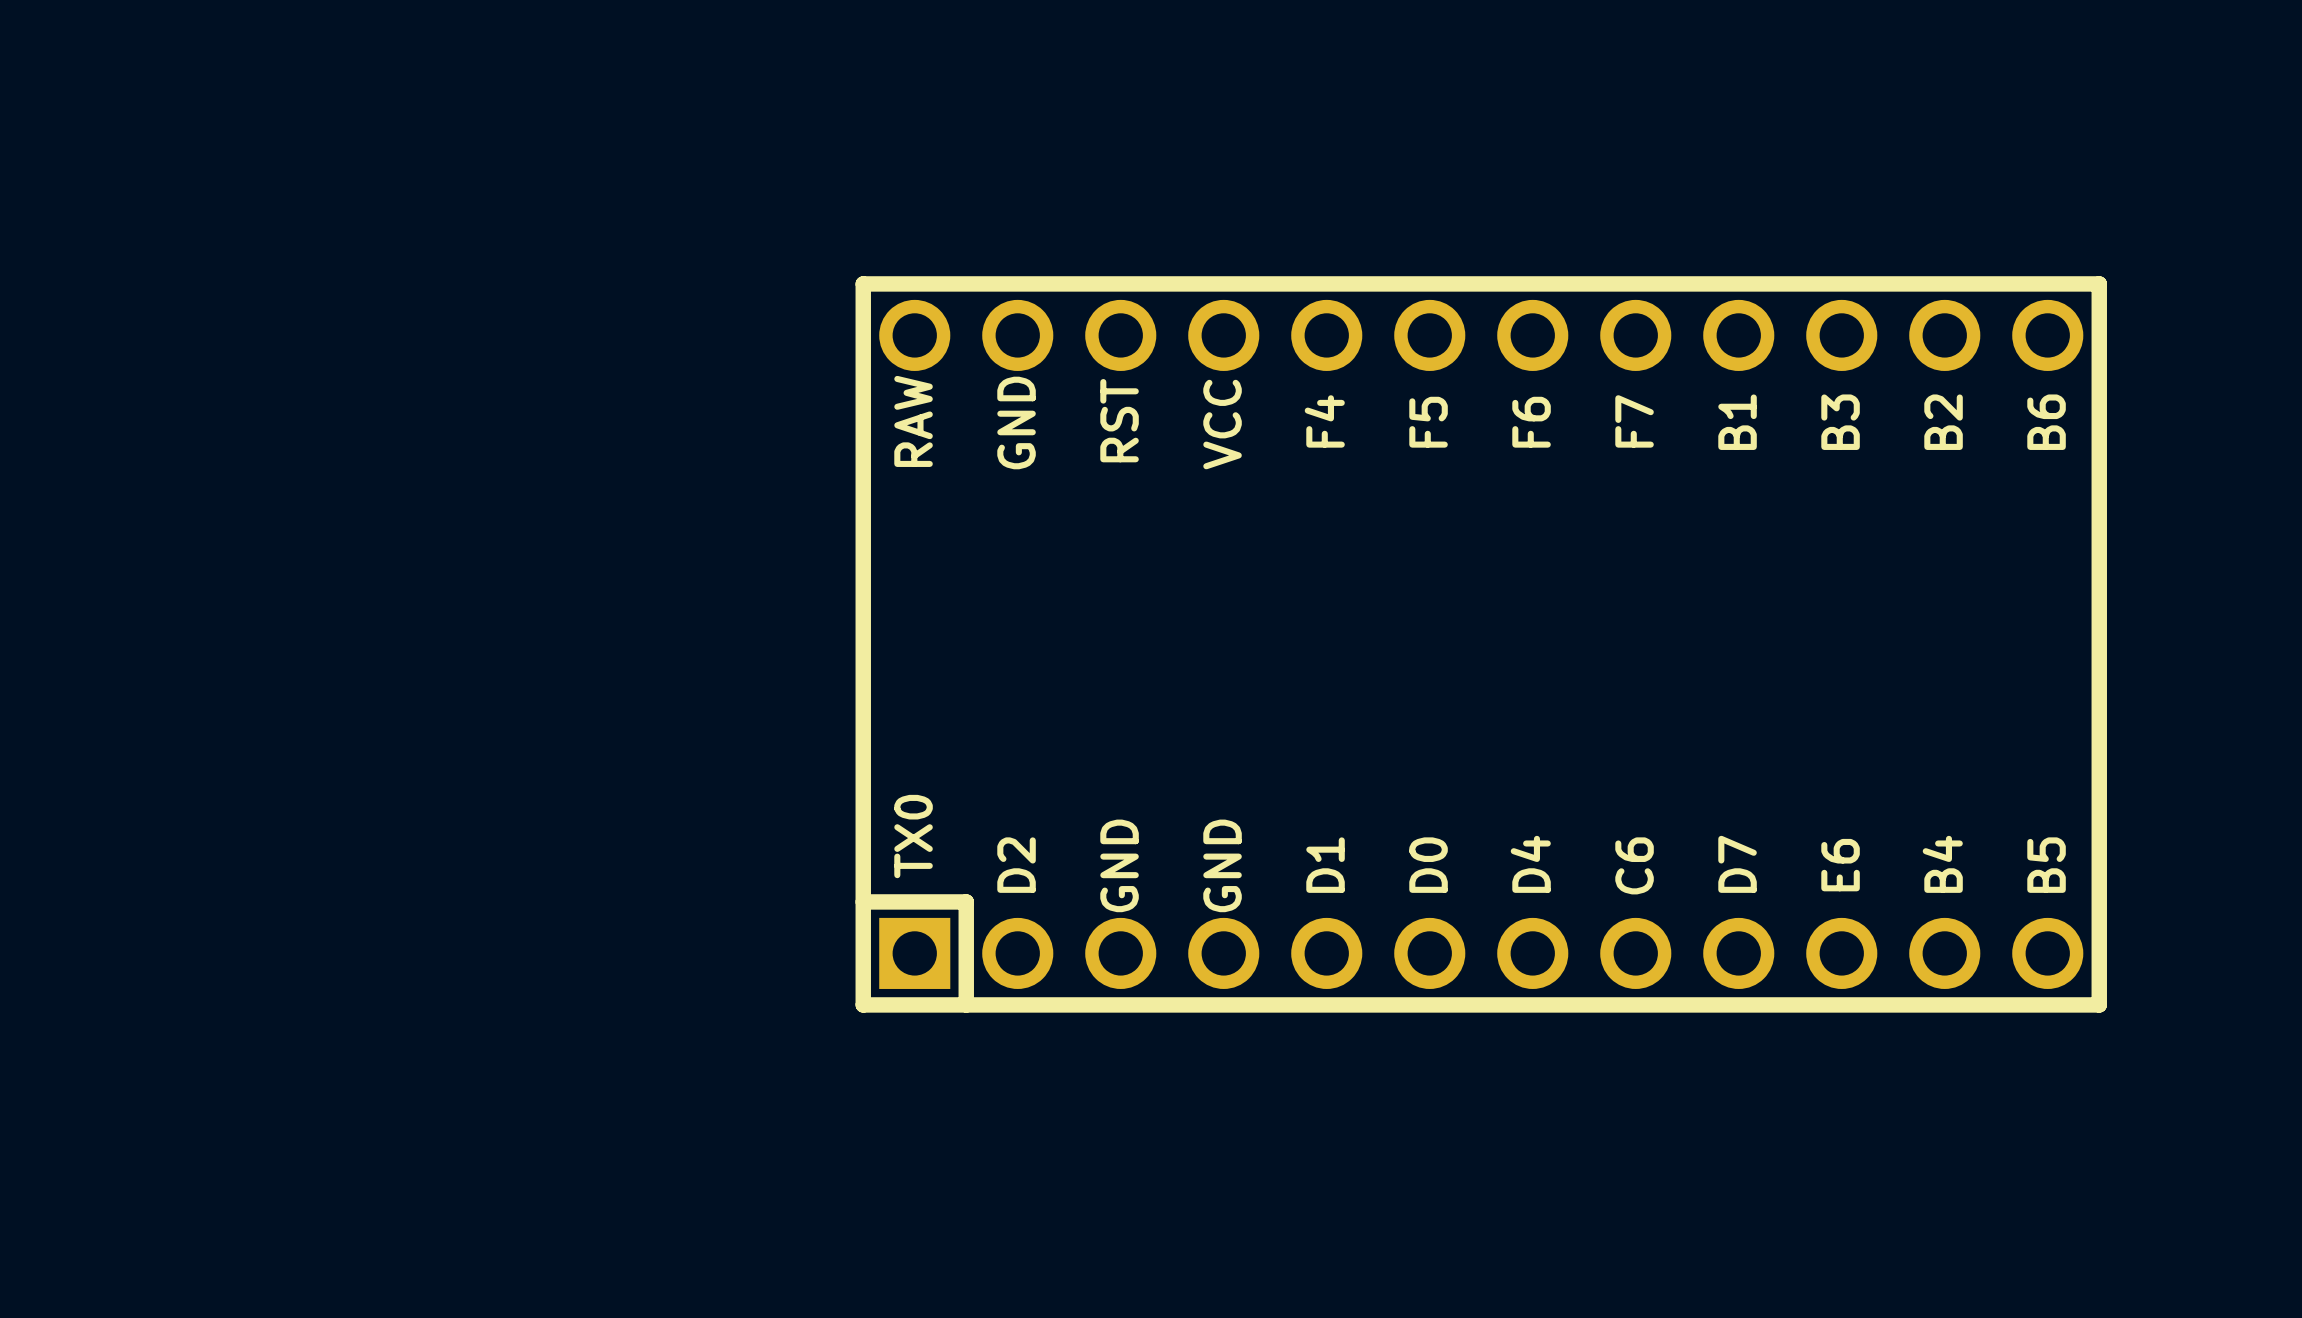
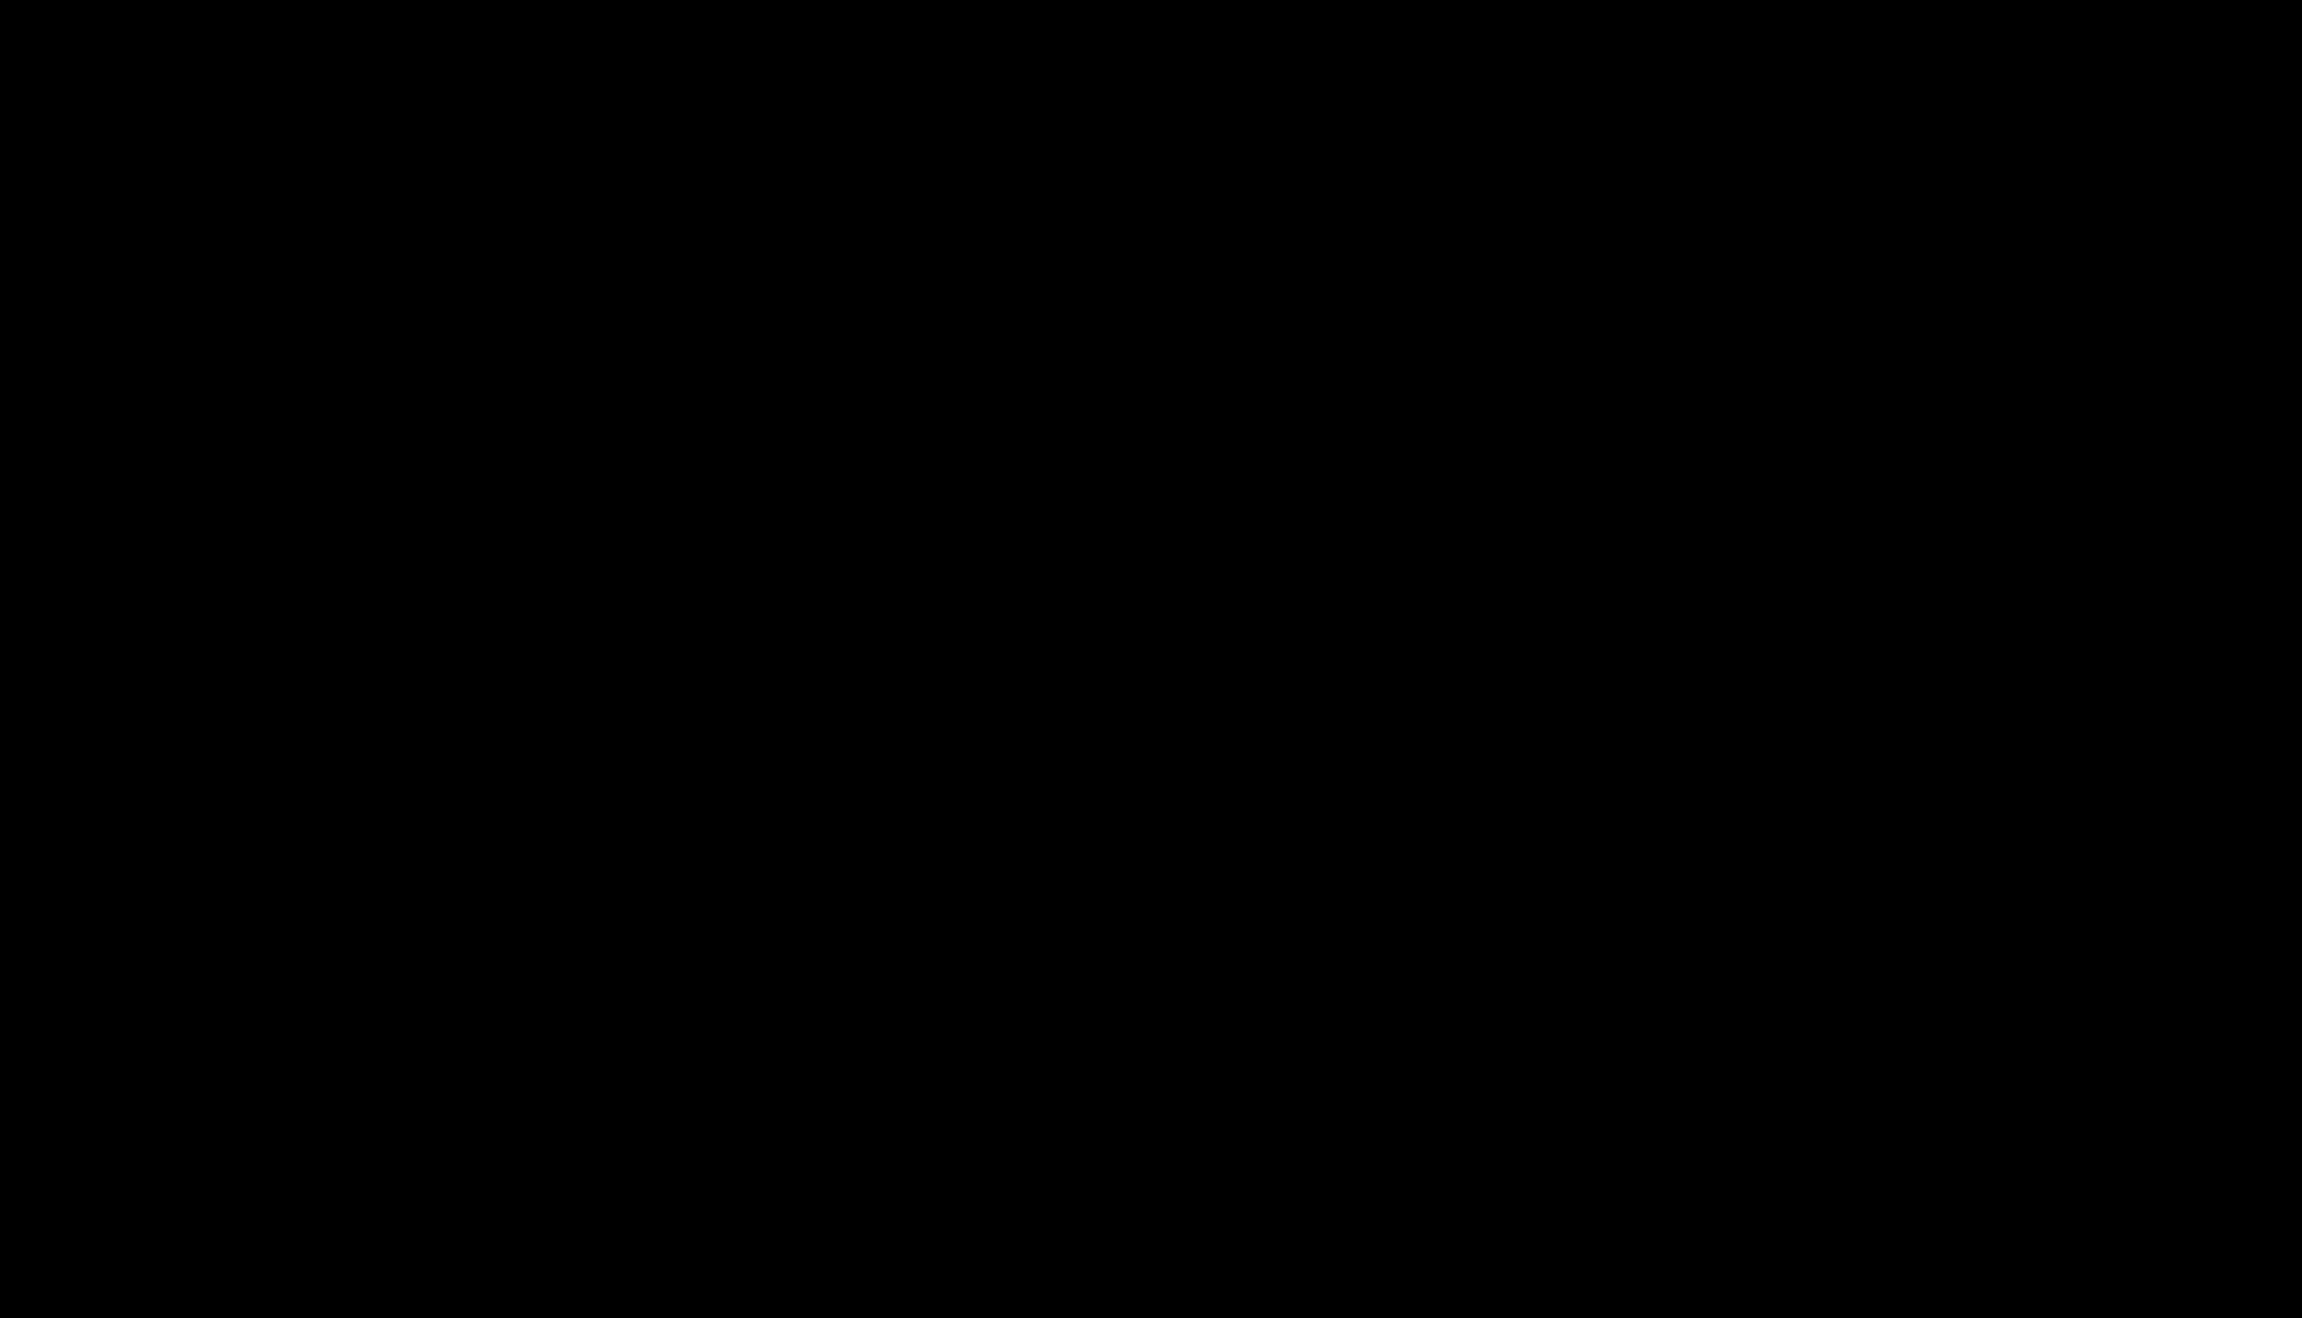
part: (1481, 644) -> none

